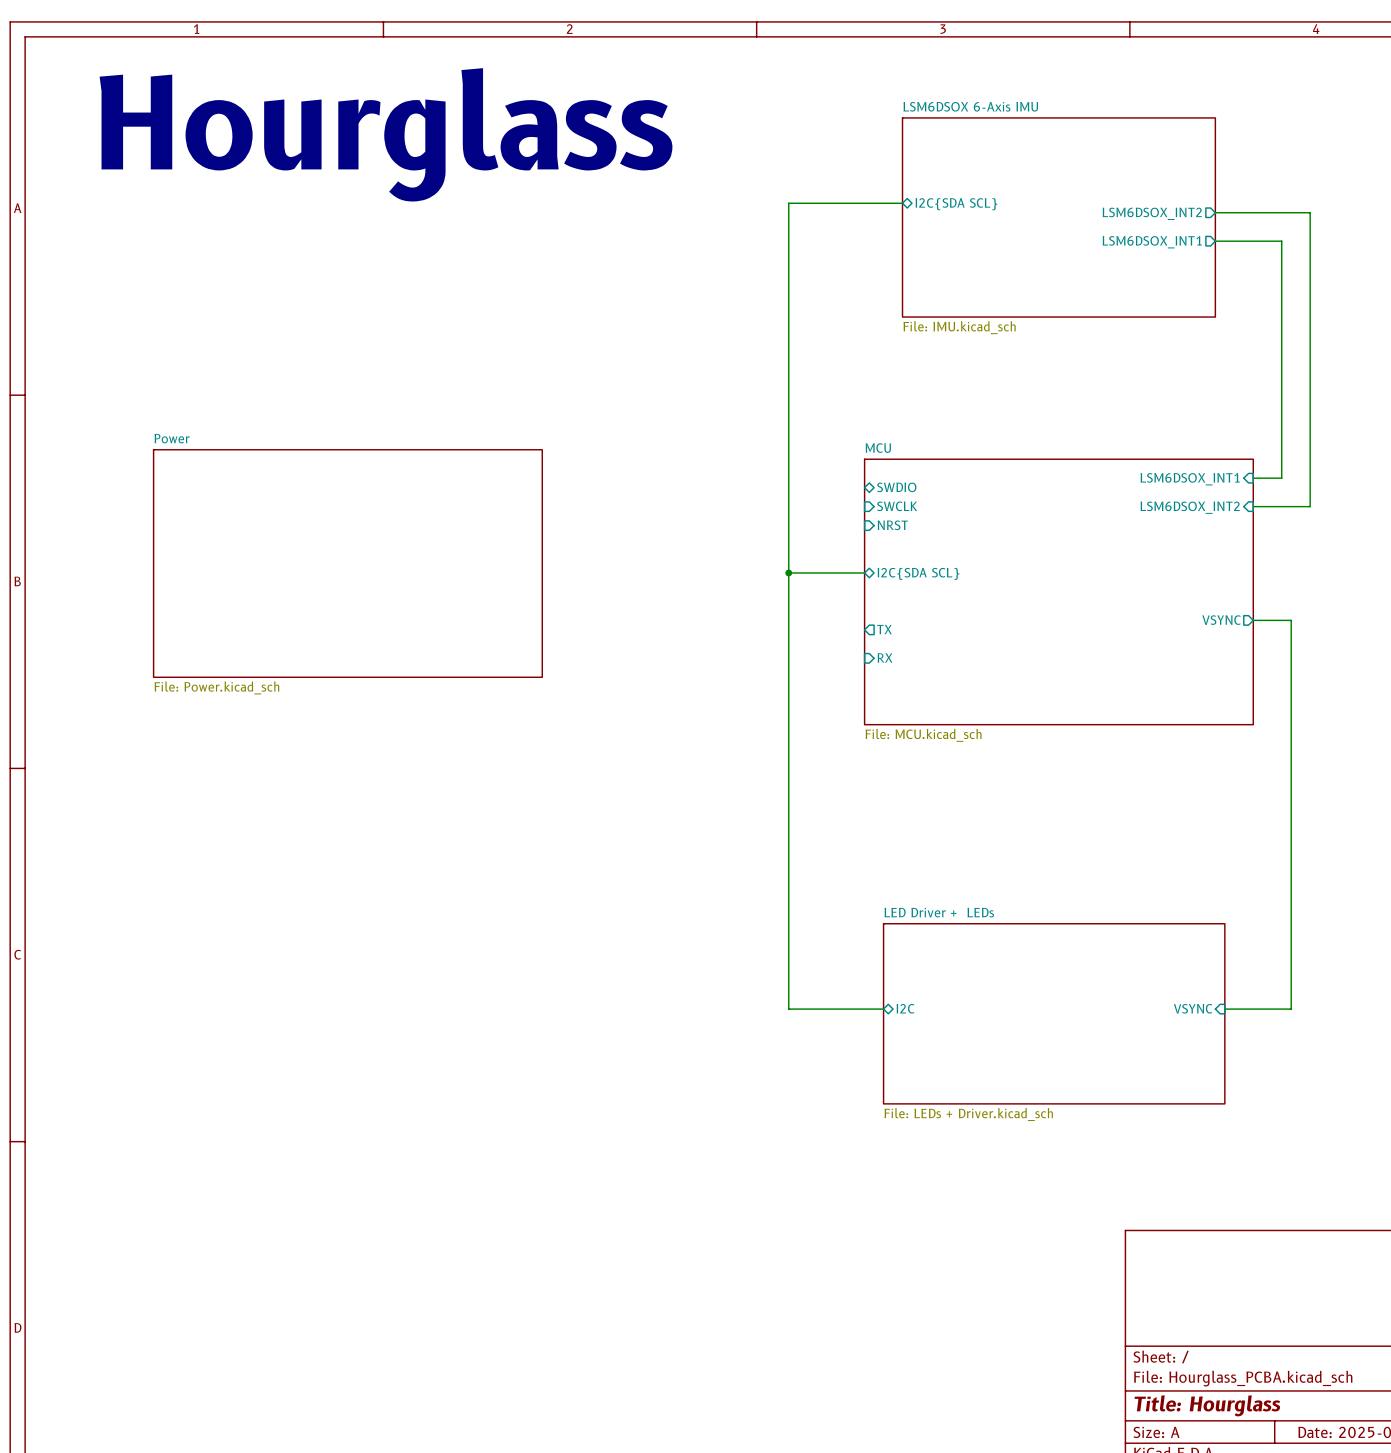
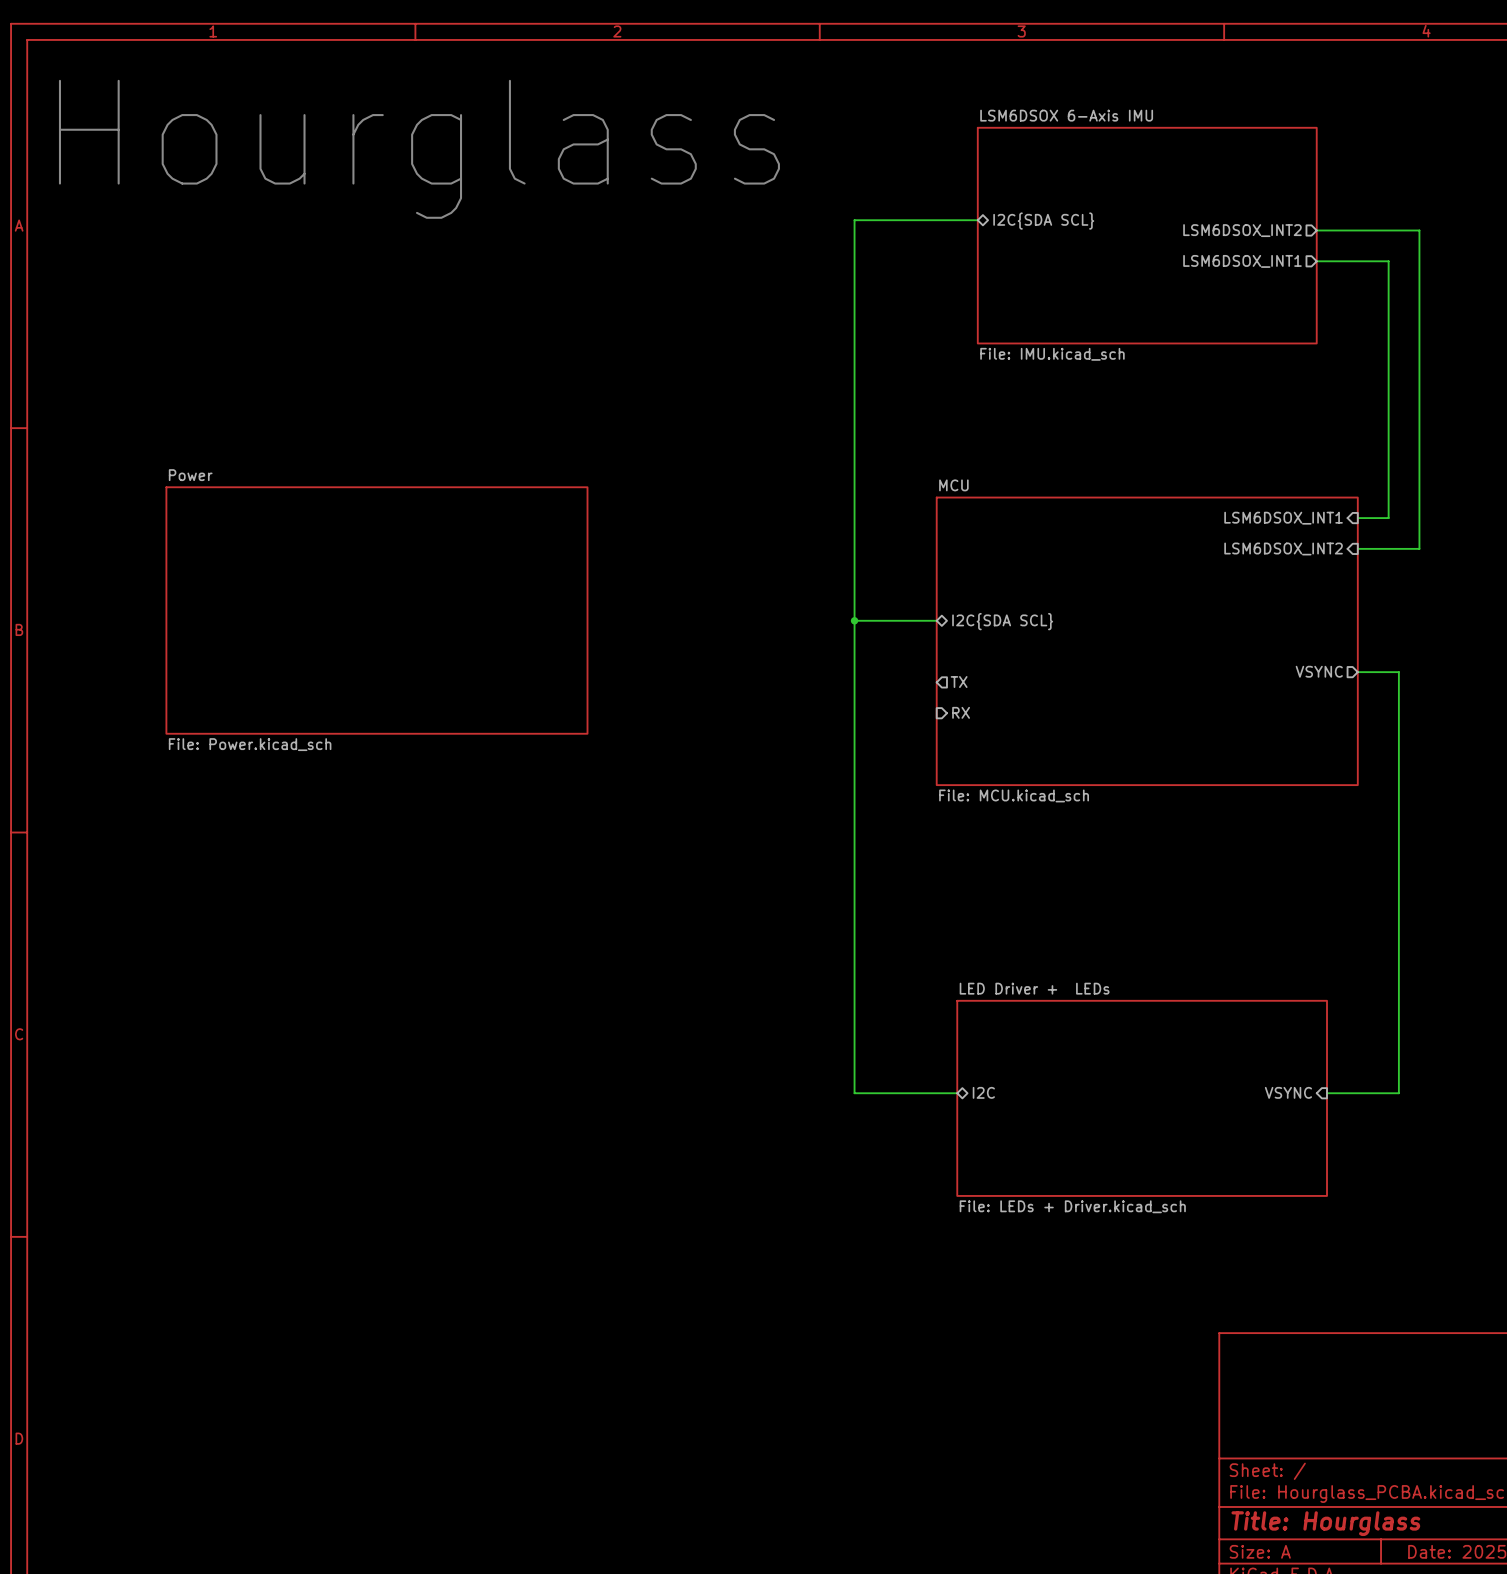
sheet pin: SWDIO (896, 487) -> none
sheet pin: SWCLK (897, 506) -> none
sheet pin: NRST (892, 525) -> none

